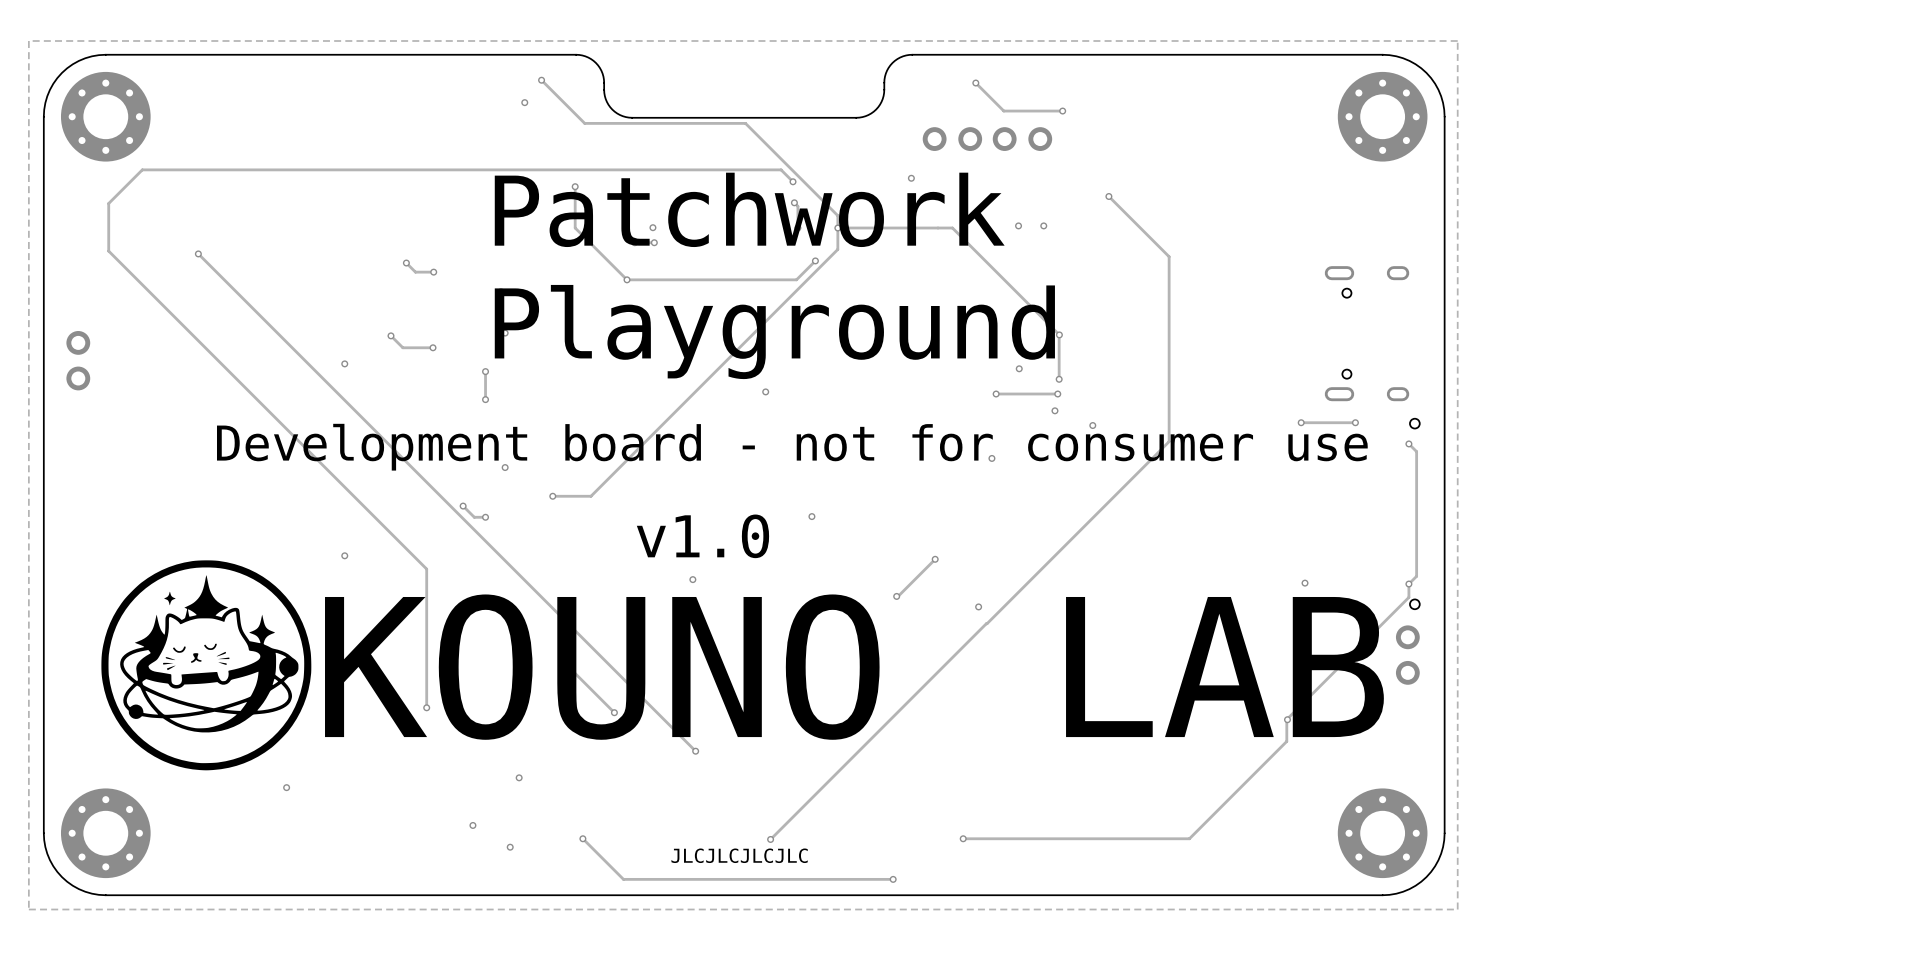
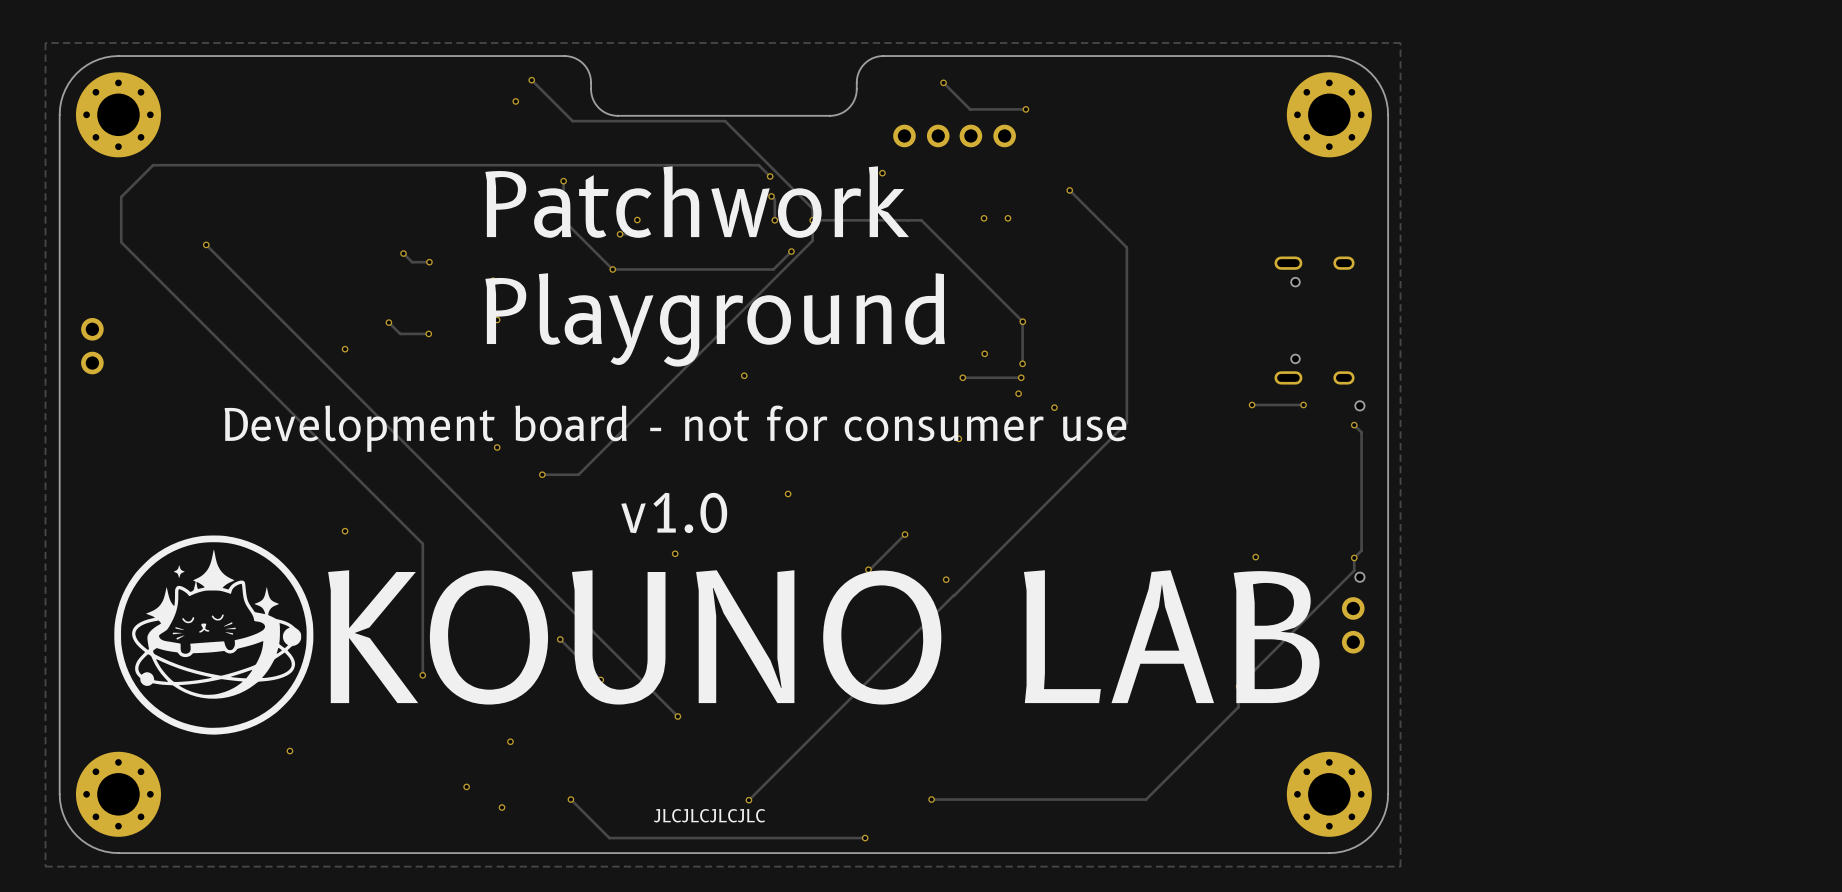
track: (485, 371) (485, 399) -> none
via: (485, 371) -> none
via: (485, 399) -> none
track: (463, 506) (474, 517) (485, 517) -> none
via: (463, 506) -> none
via: (485, 517) -> none

